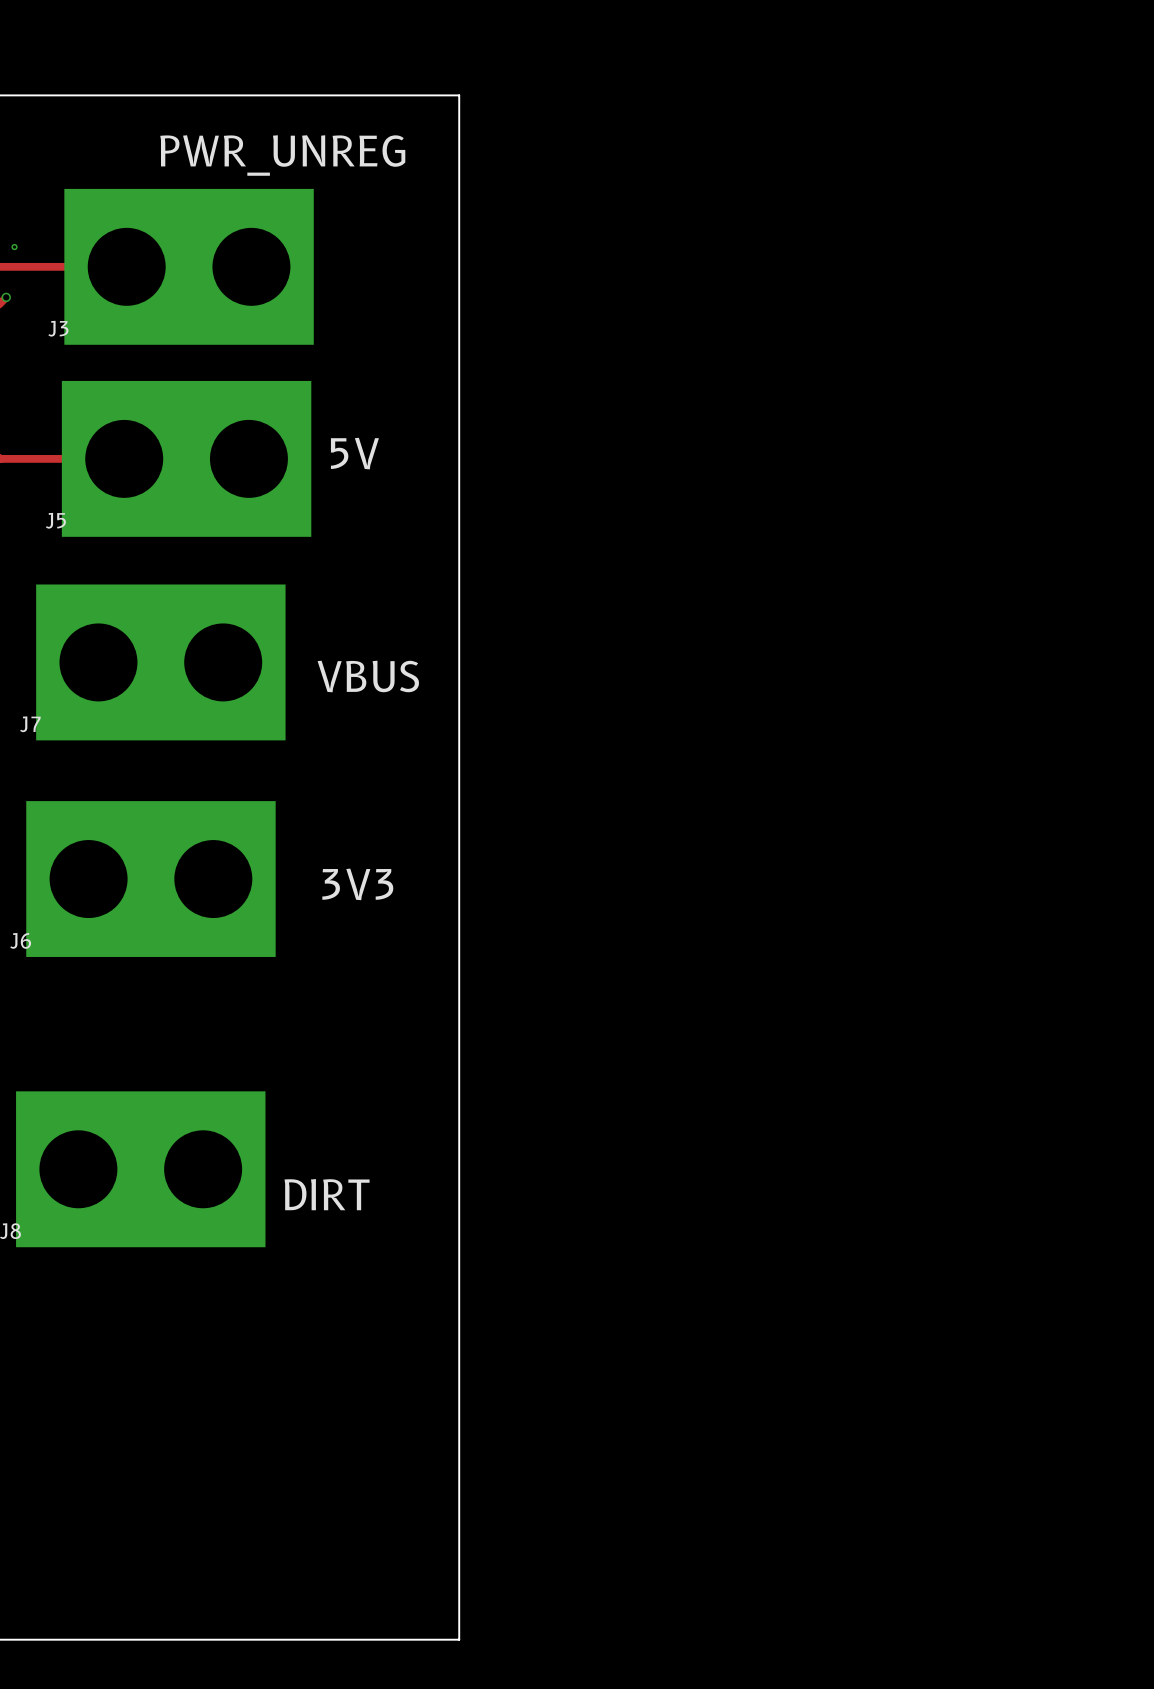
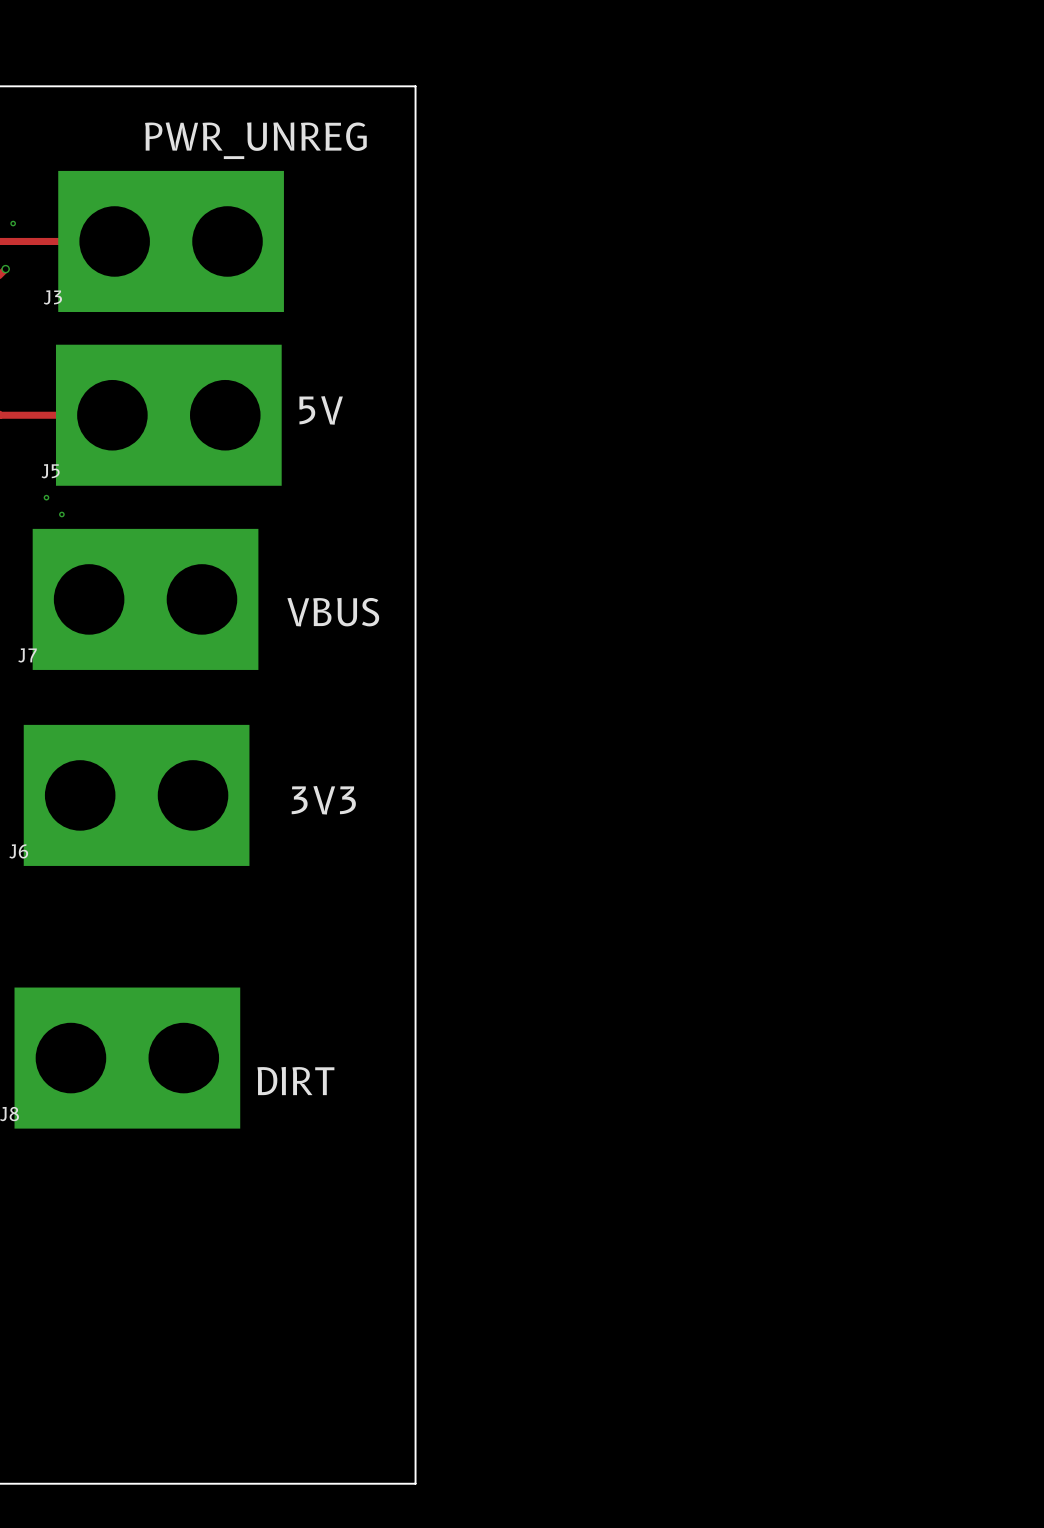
via: none -> (46, 497)
via: none -> (61, 514)

